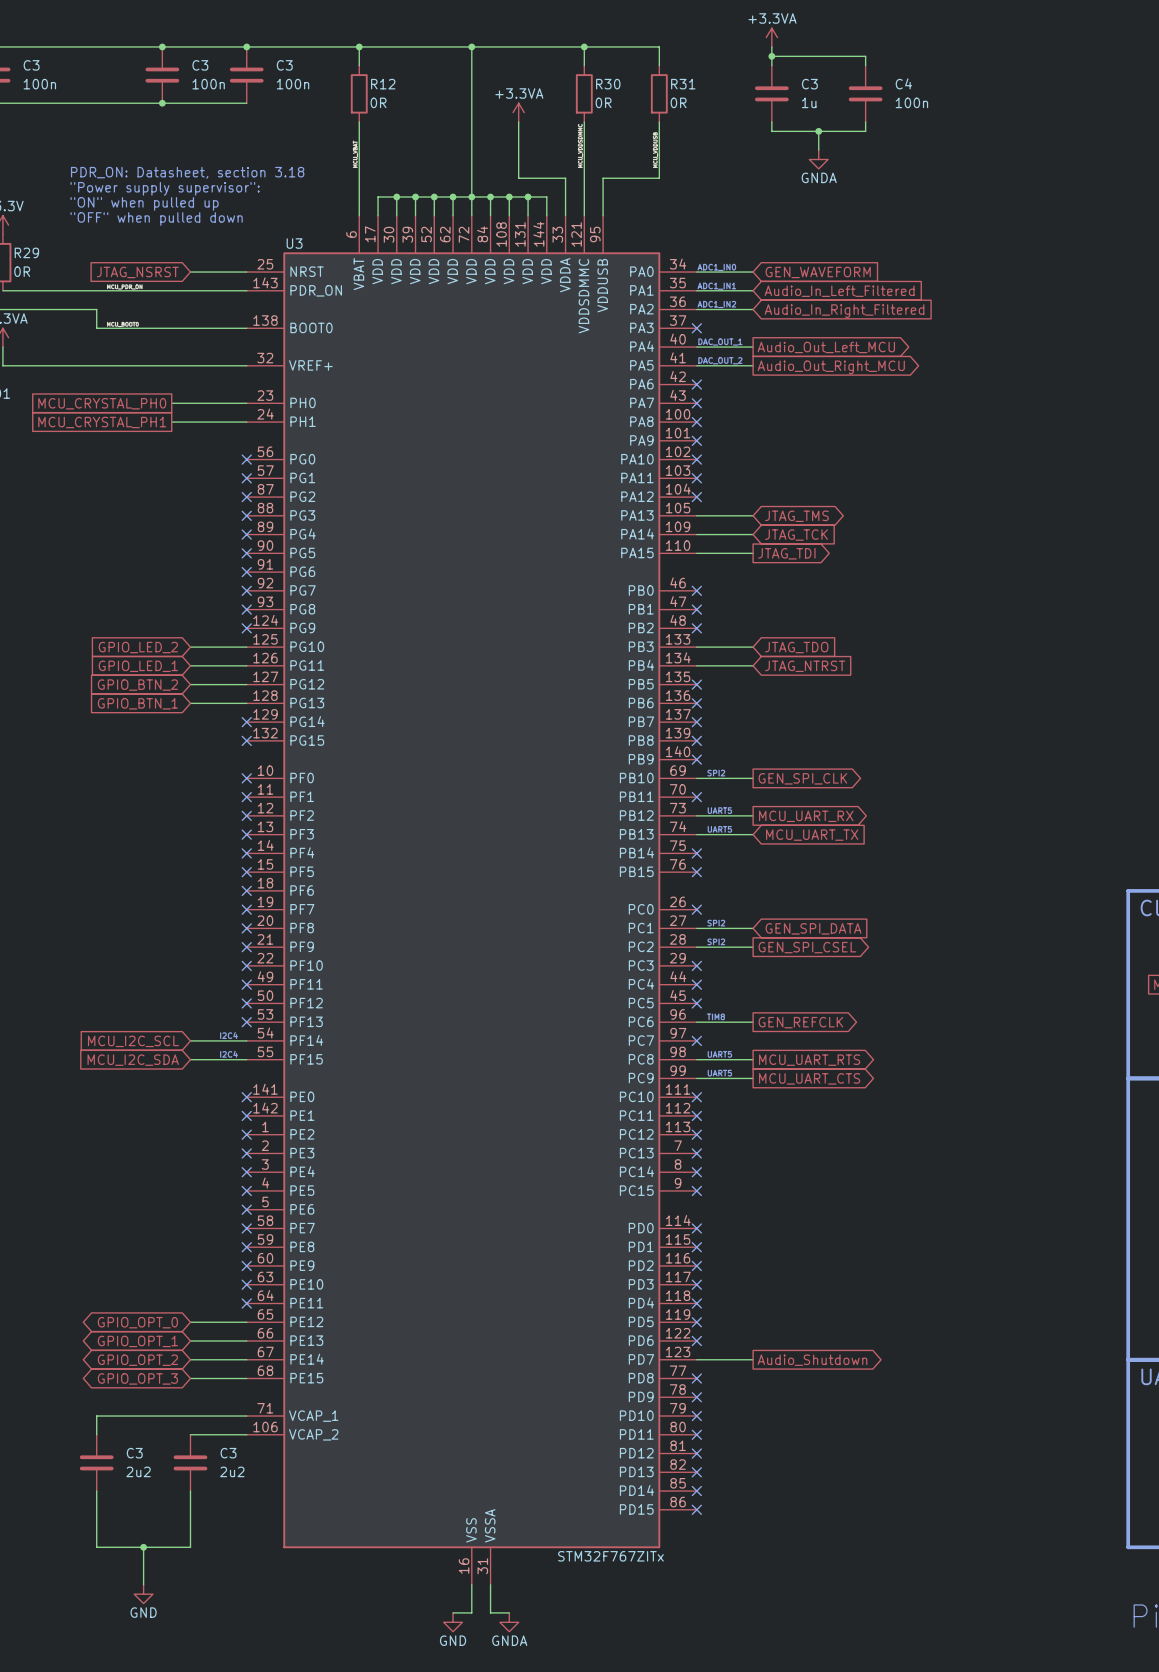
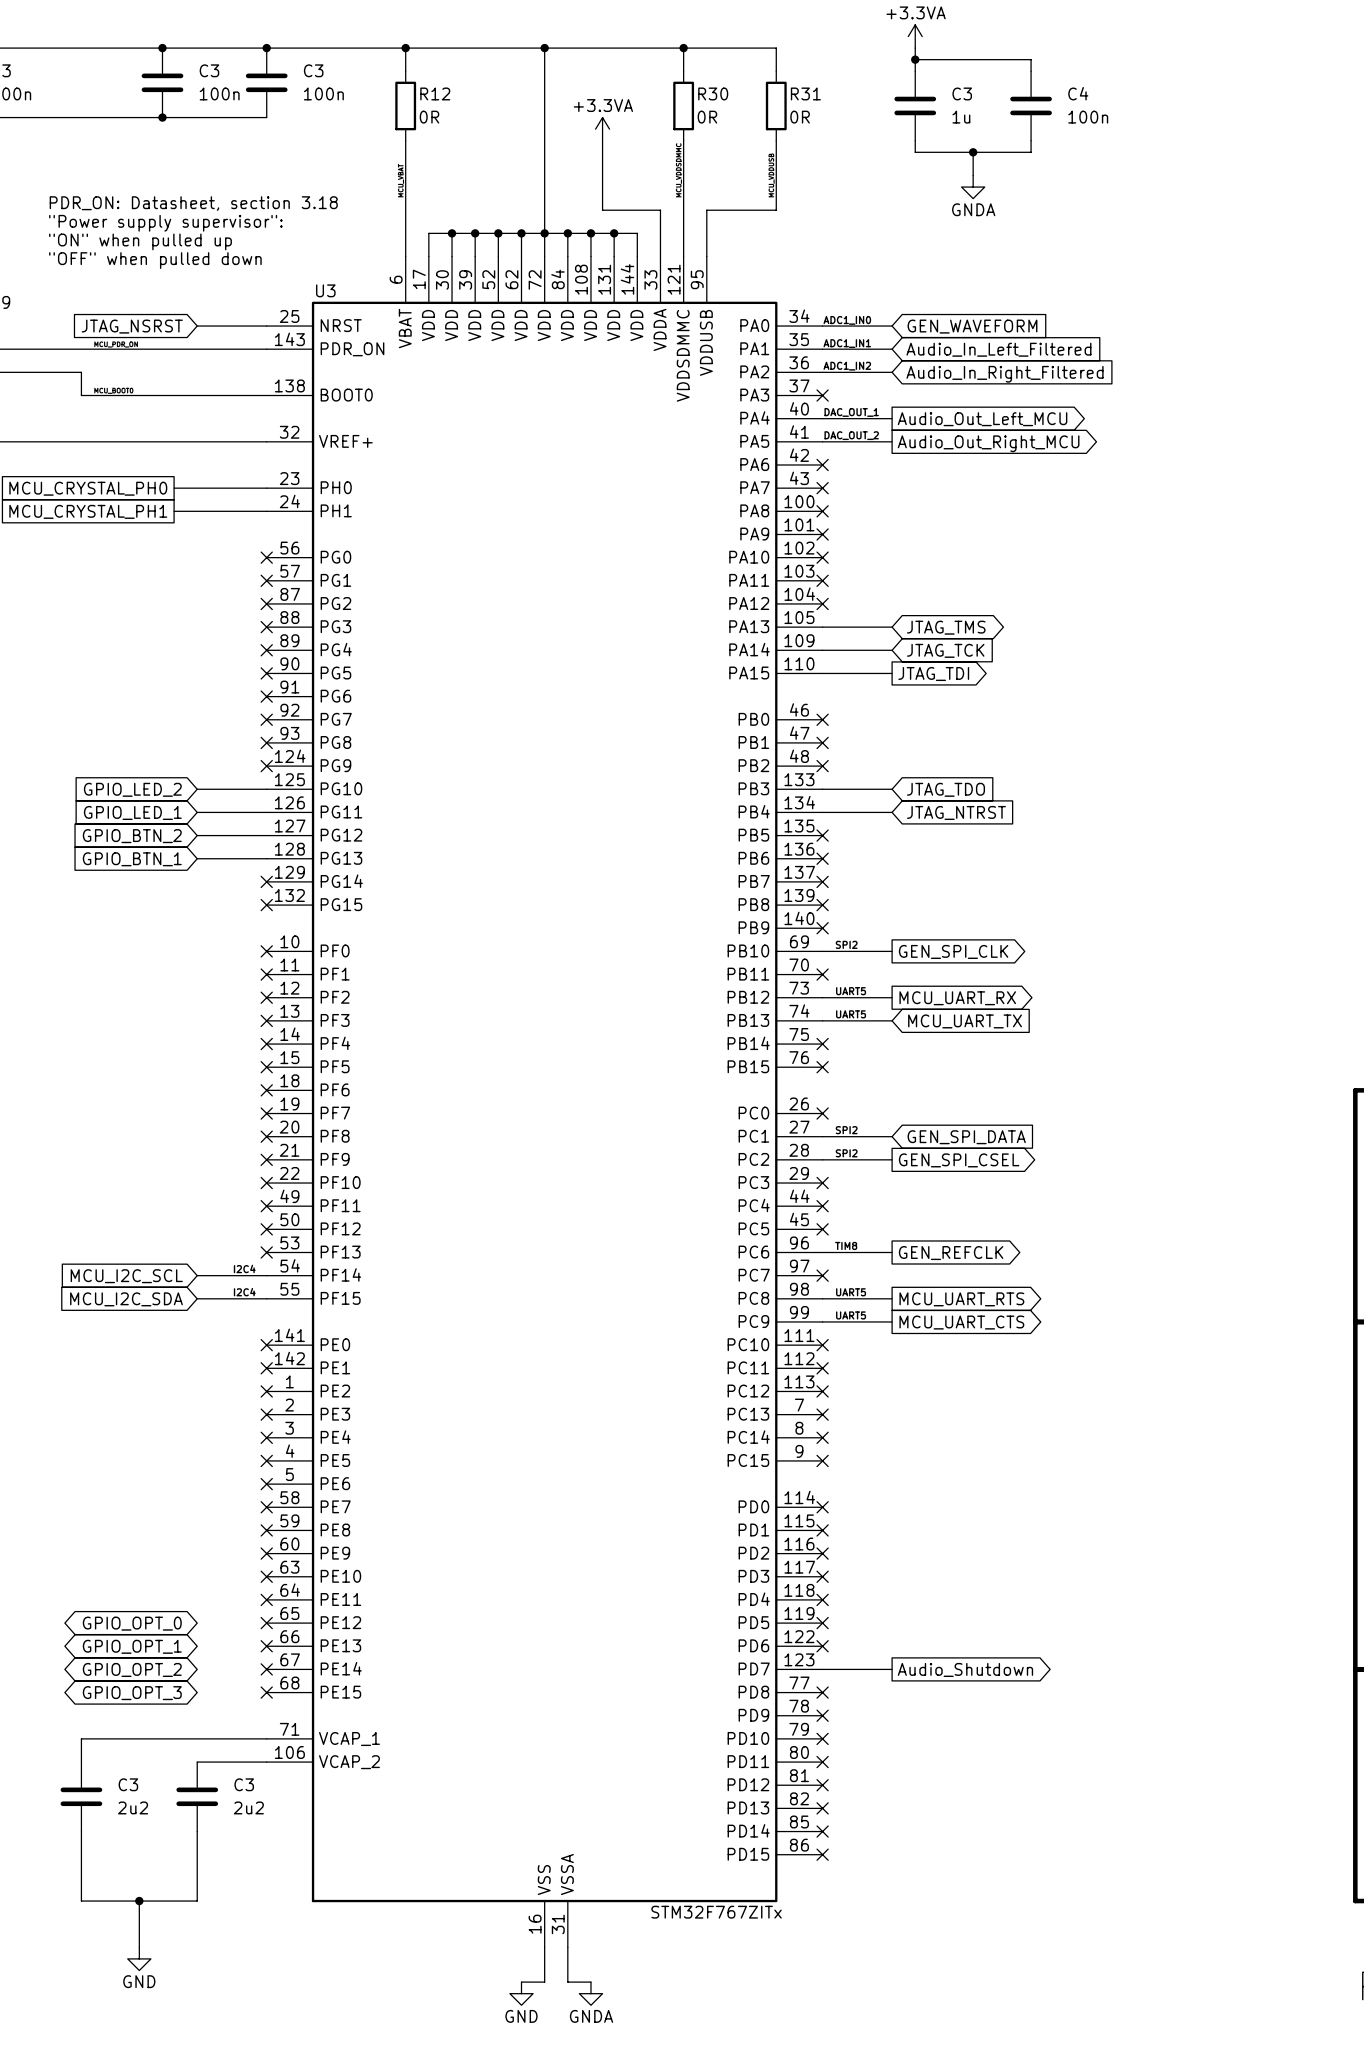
wire: (190, 1322) (246, 1322) -> none
no-connect mark: none -> (266, 1623)
wire: (190, 1341) (246, 1341) -> none
no-connect mark: none -> (266, 1646)
wire: (190, 1359) (246, 1359) -> none
no-connect mark: none -> (266, 1669)
wire: (190, 1378) (246, 1378) -> none
no-connect mark: none -> (266, 1692)

